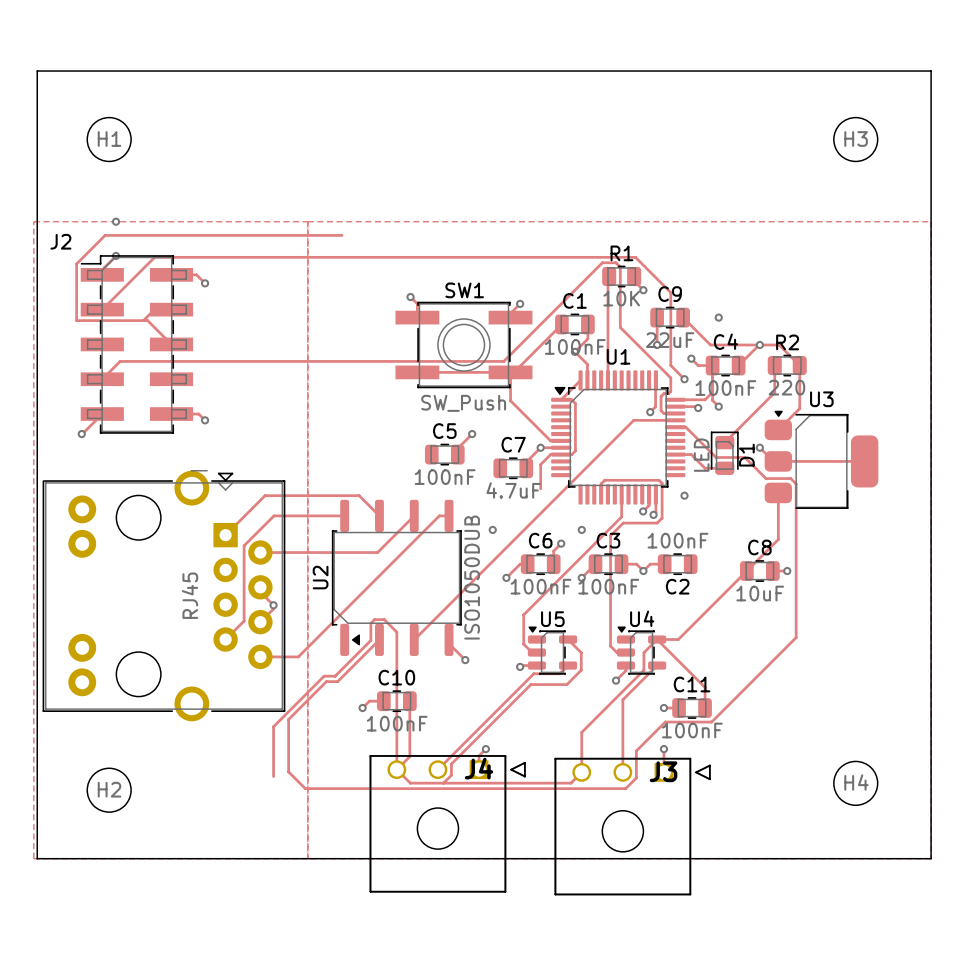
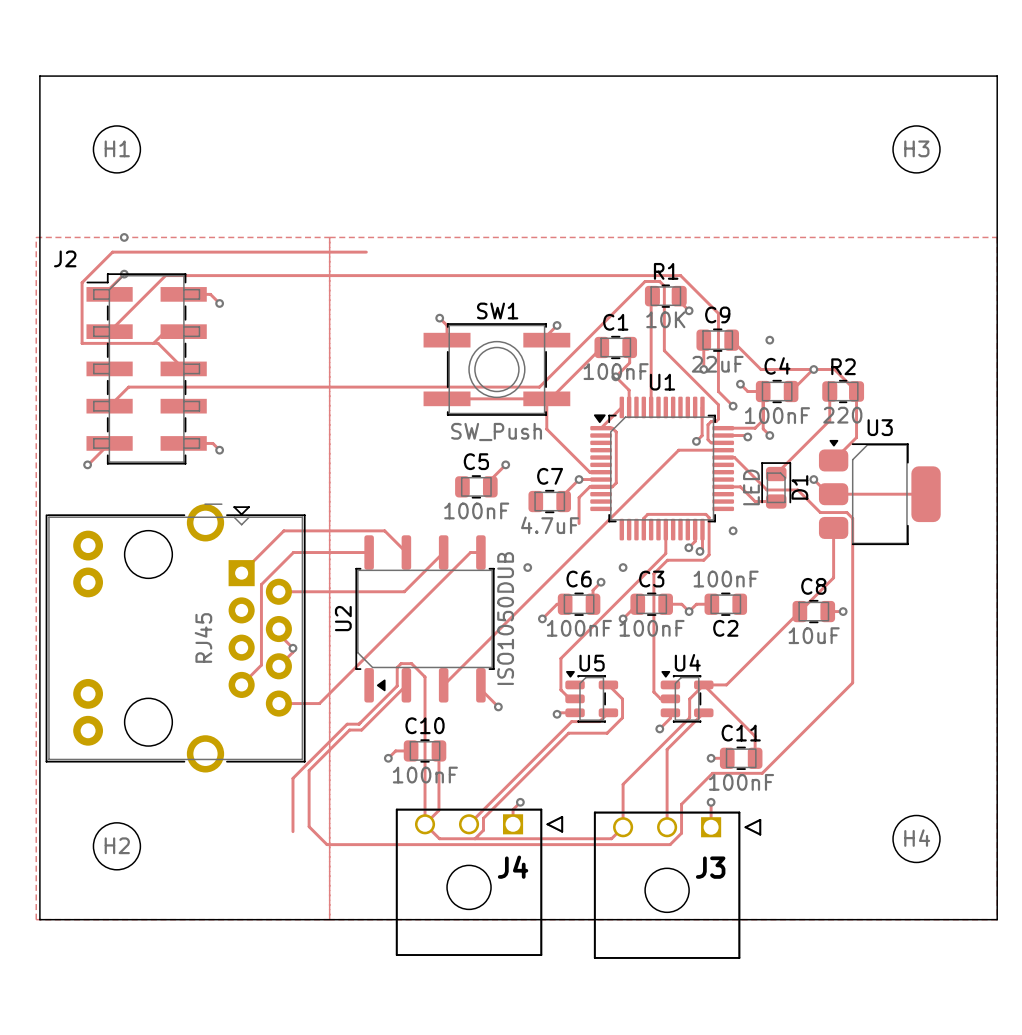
J4 name position: J4 (479, 768) -> J4 (513, 867)
J3 name position: J3 (663, 771) -> J3 (710, 867)

